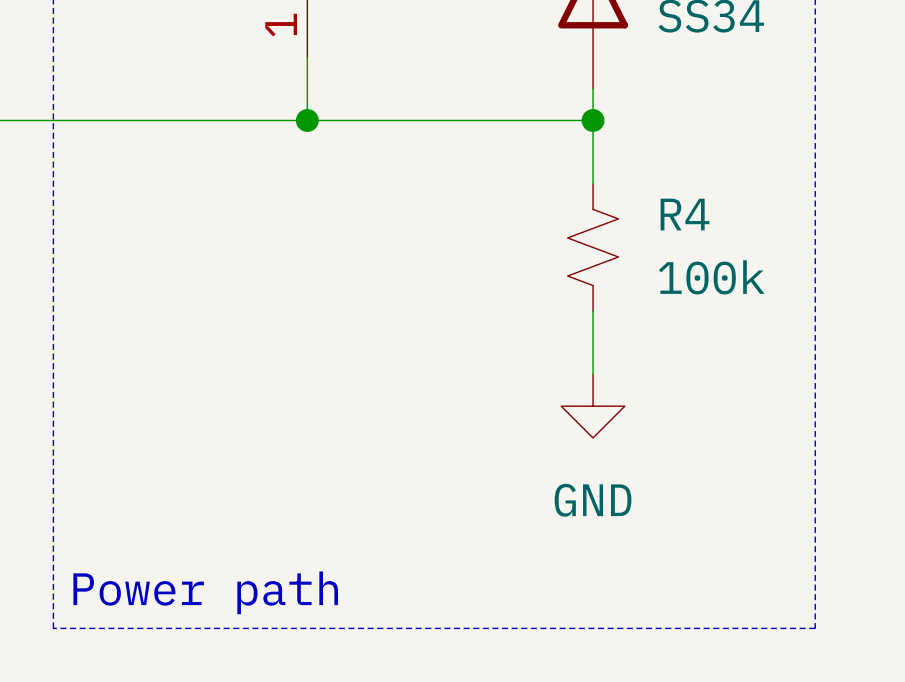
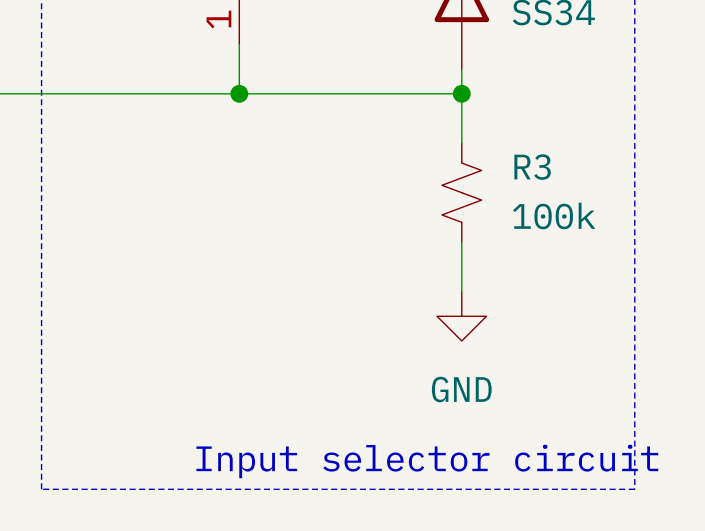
R4 name: R4 (685, 214) -> R3 (532, 167)
text: Power path (205, 592) -> none
text: none -> Input selector circuit (427, 461)

